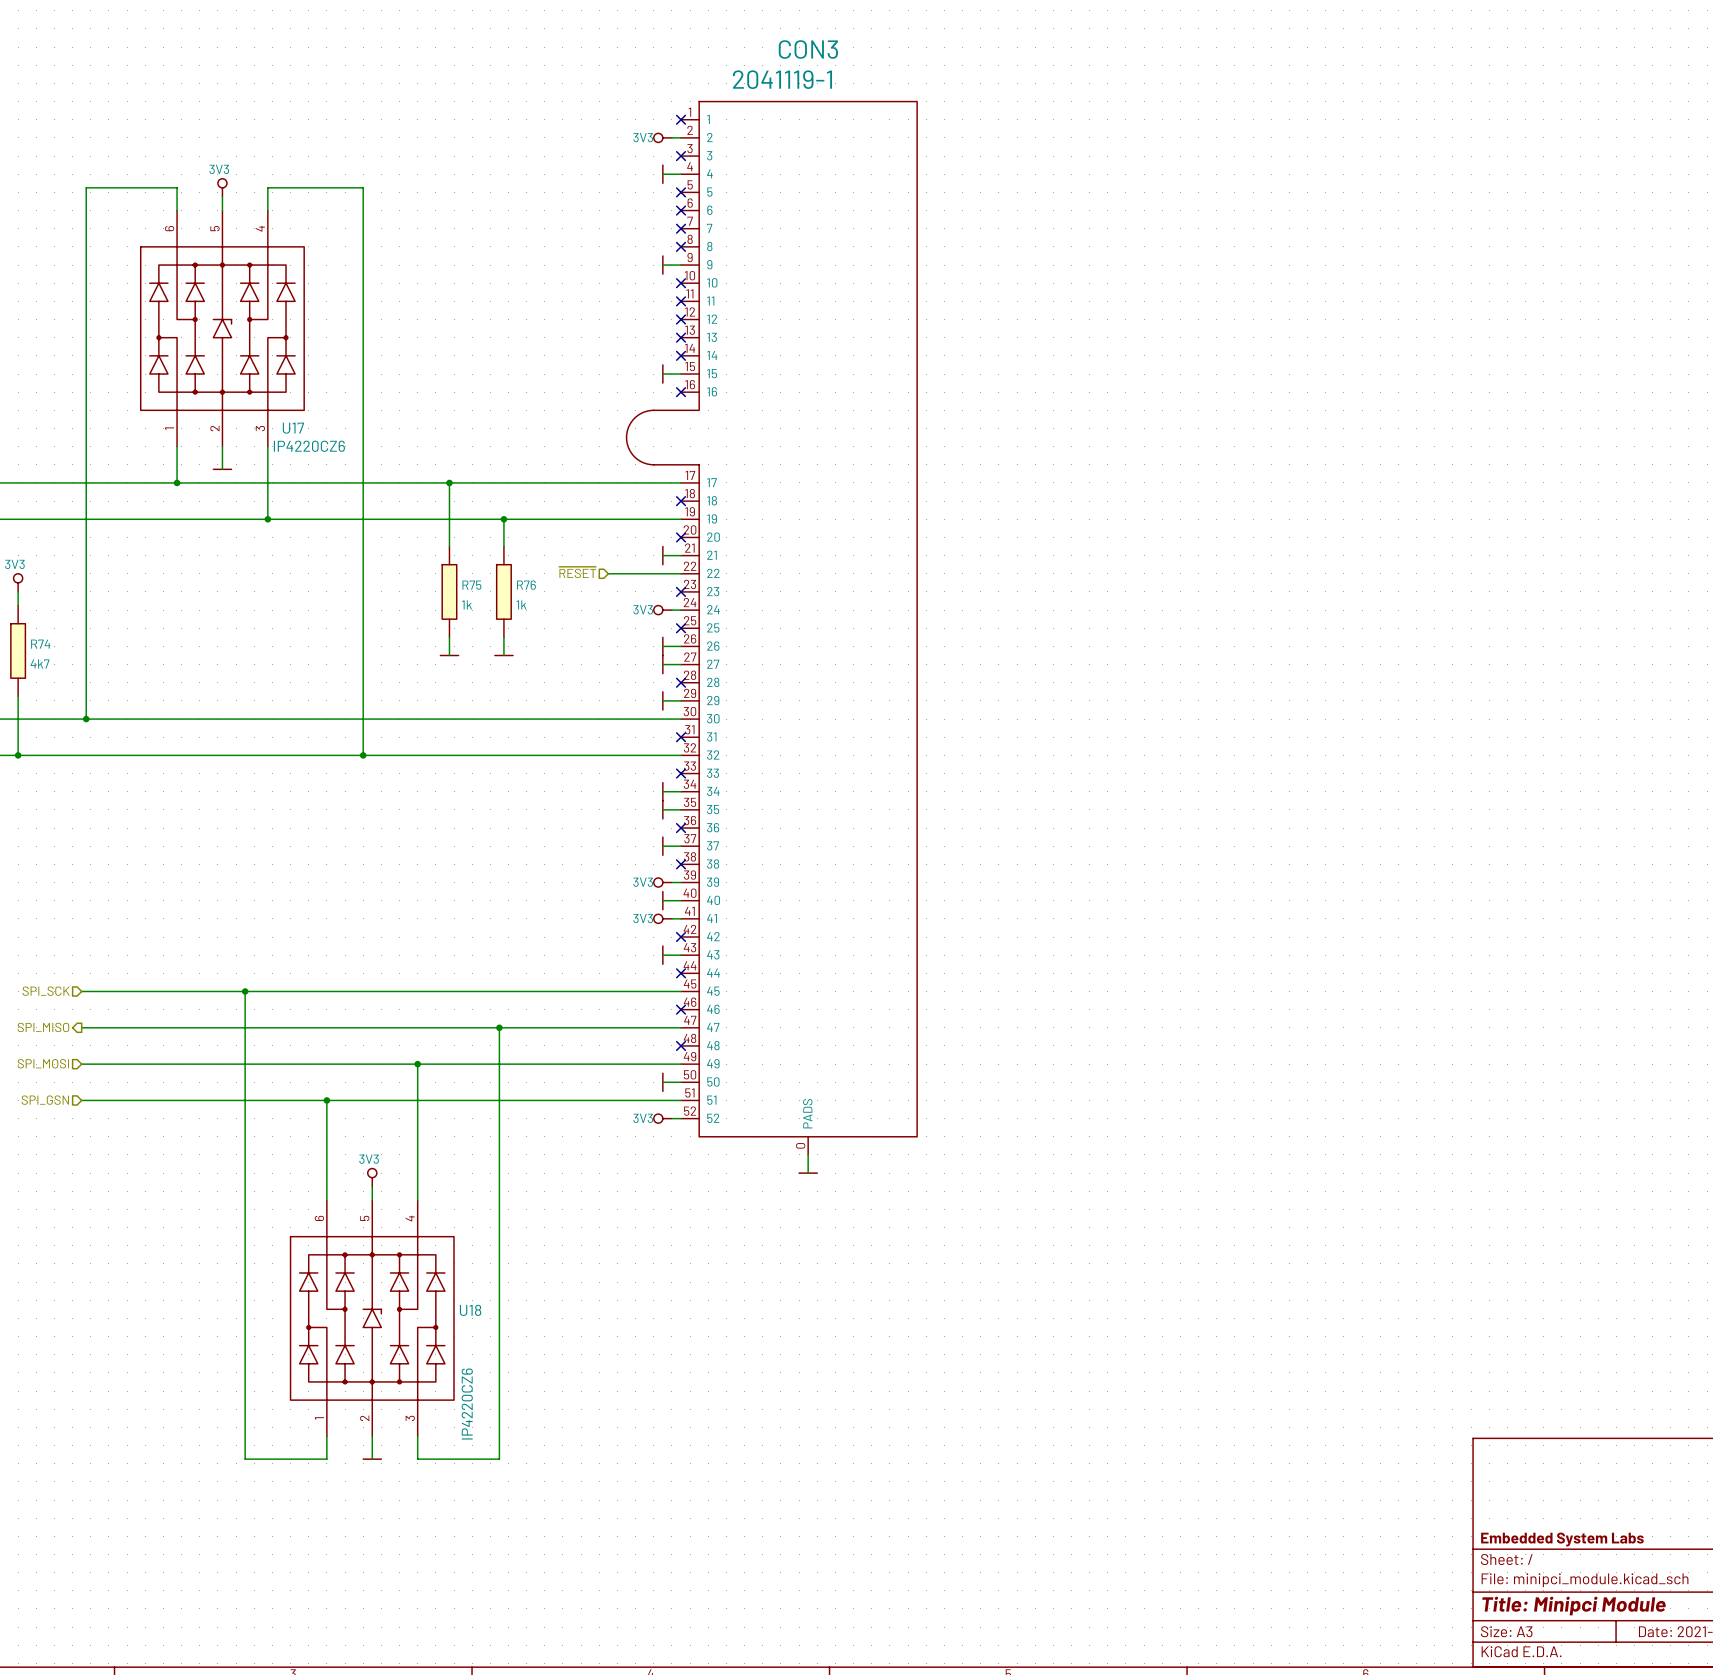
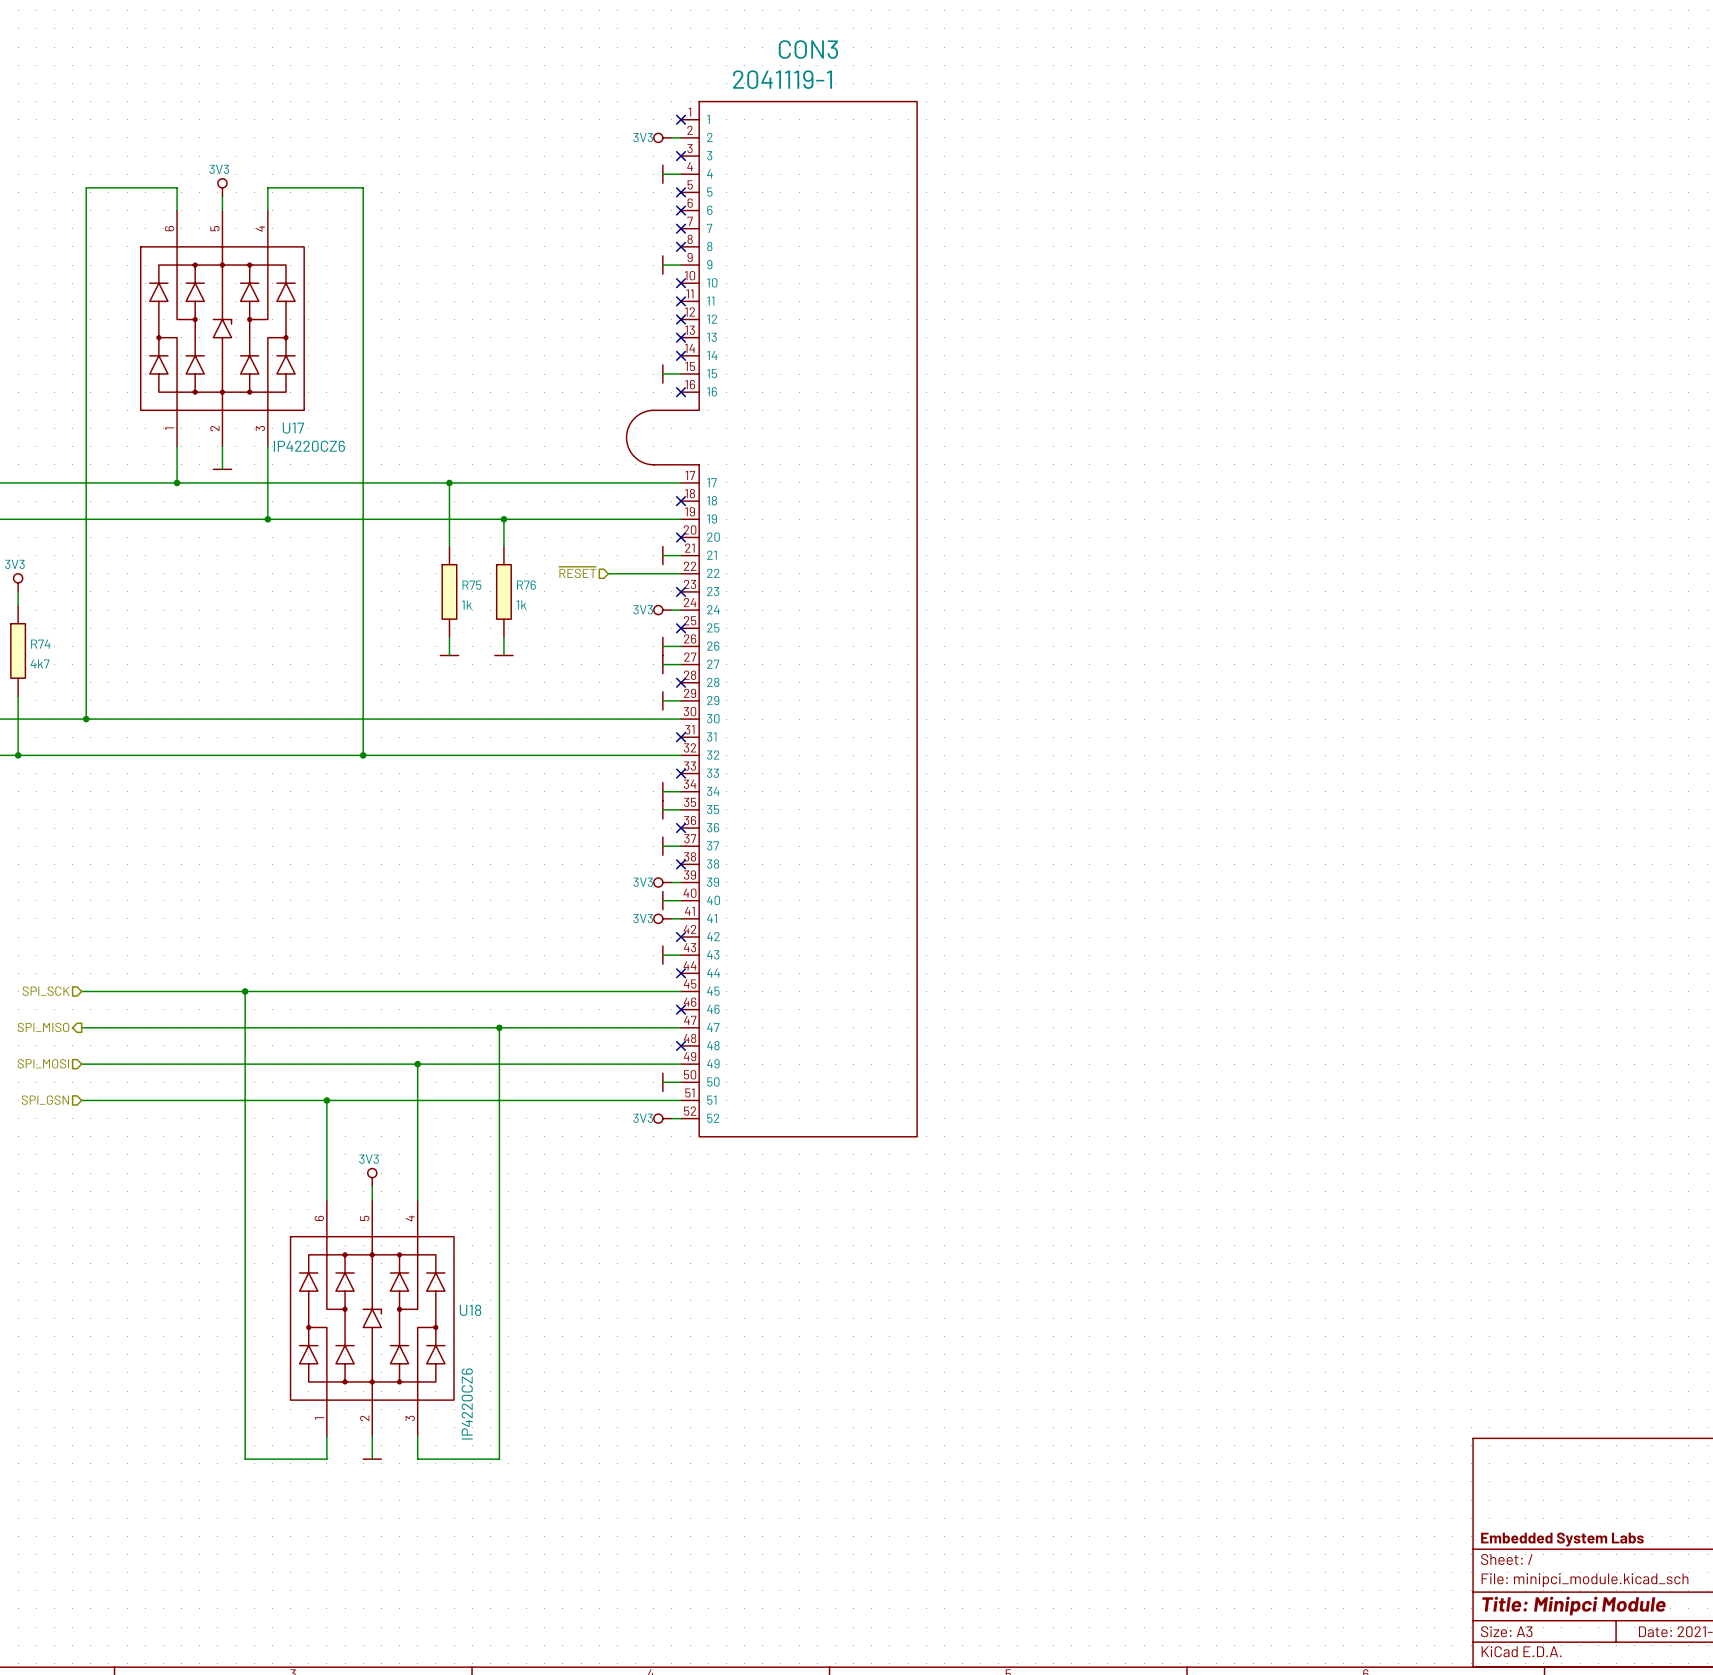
CON3 symbol: [626, 101, 918, 1155] -> [626, 101, 918, 1137]
wire: (808, 1154) (808, 1173) -> none
power symbol: (808, 1173) -> none

